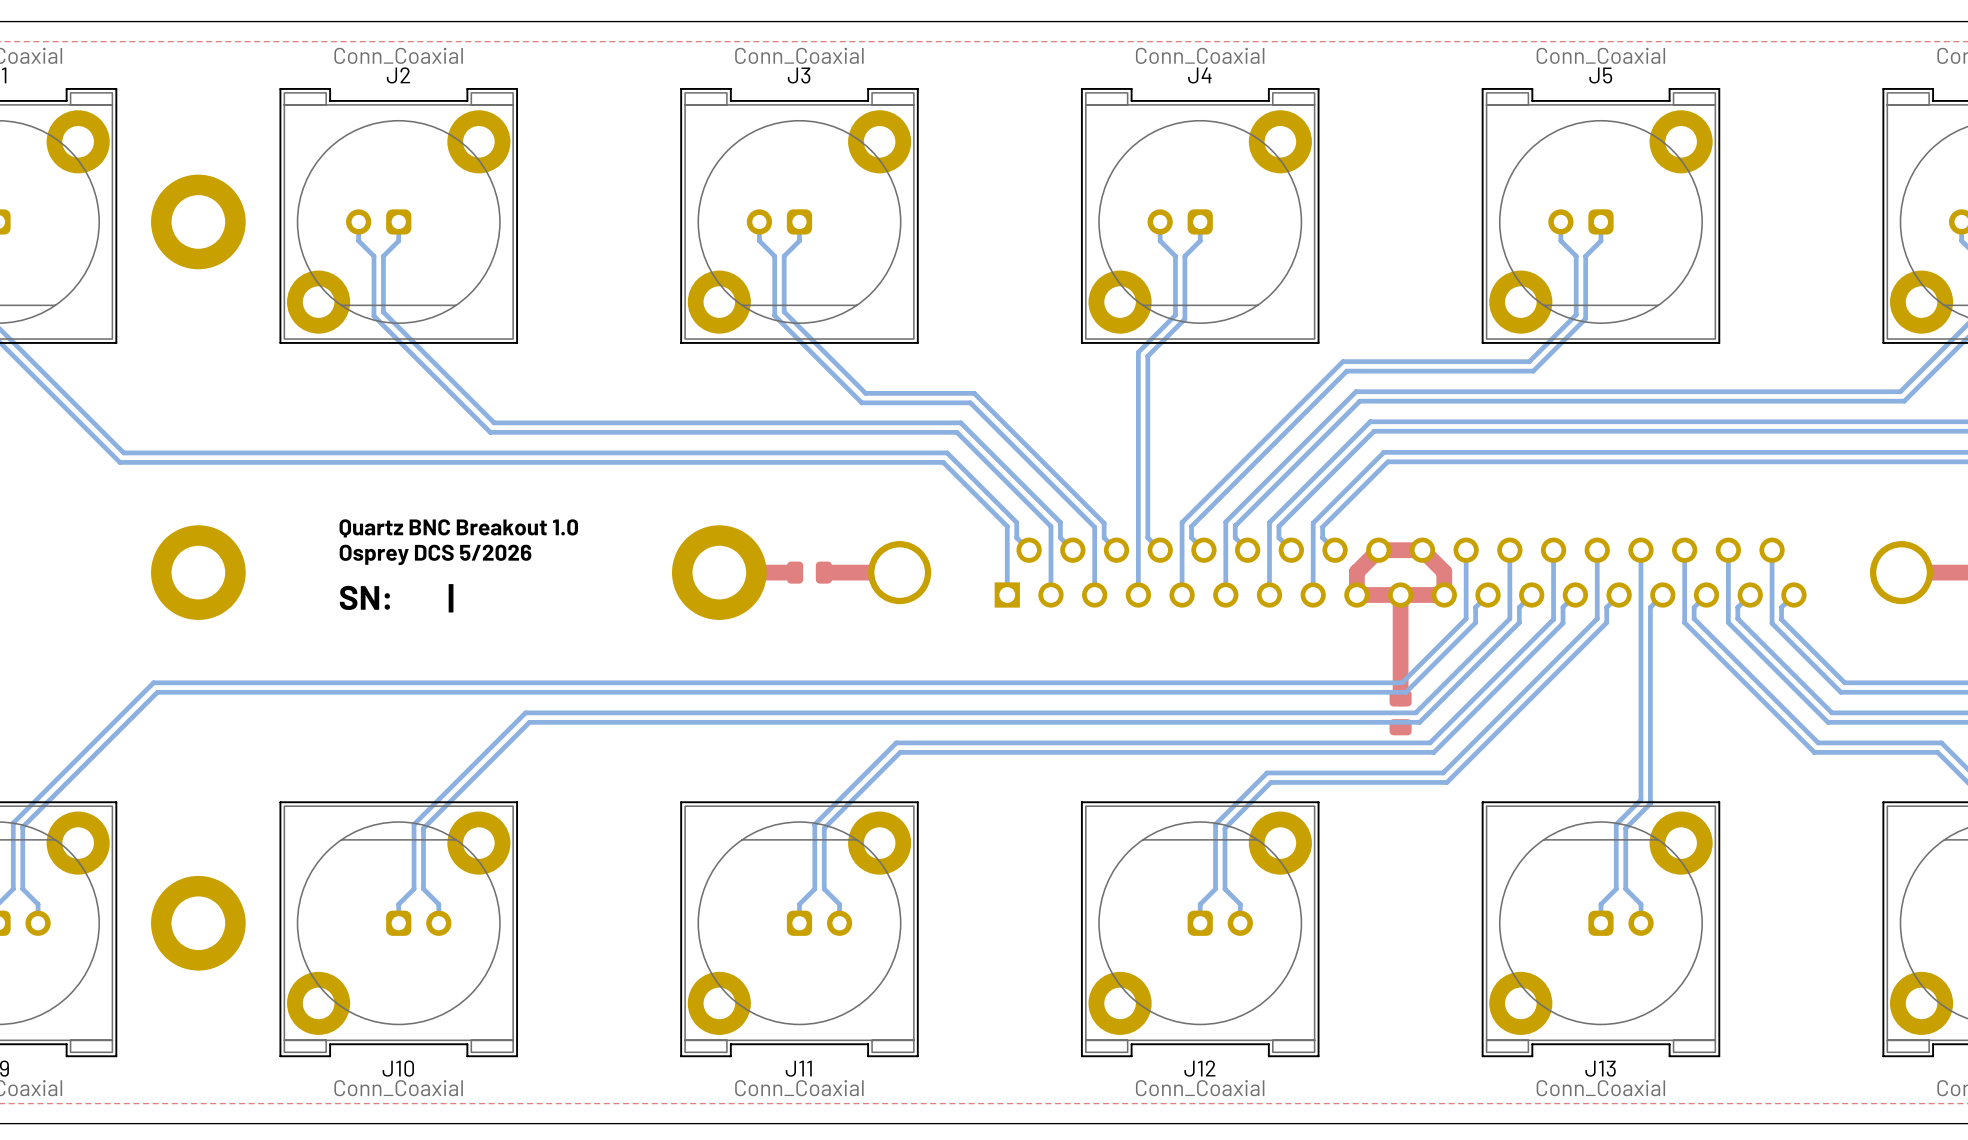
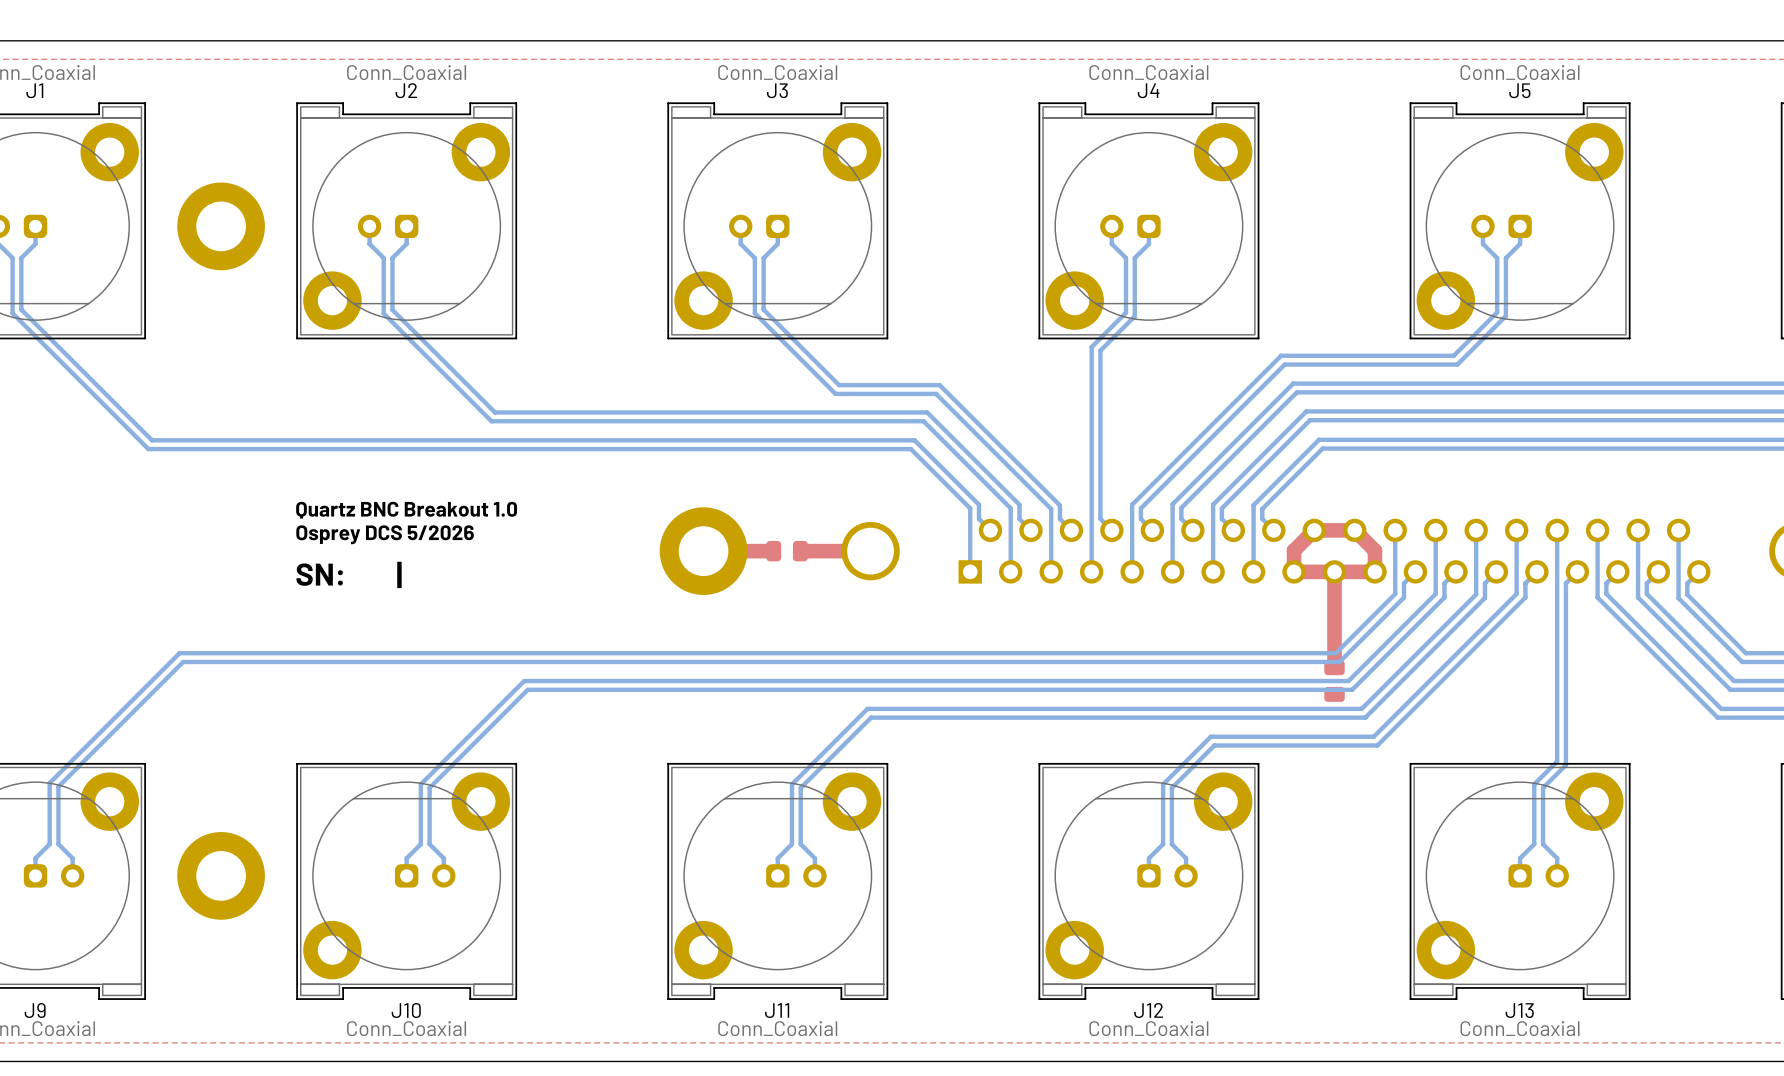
text position: Quartz BNC Breakout 1.0 (458, 528) -> Quartz BNC Breakout 1.0 (406, 510)
text position: Osprey DCS 5/2026 (435, 554) -> Osprey DCS 5/2026 (385, 534)
part: (198, 572) -> none
text position: SN: | (396, 598) -> SN: | (349, 574)

